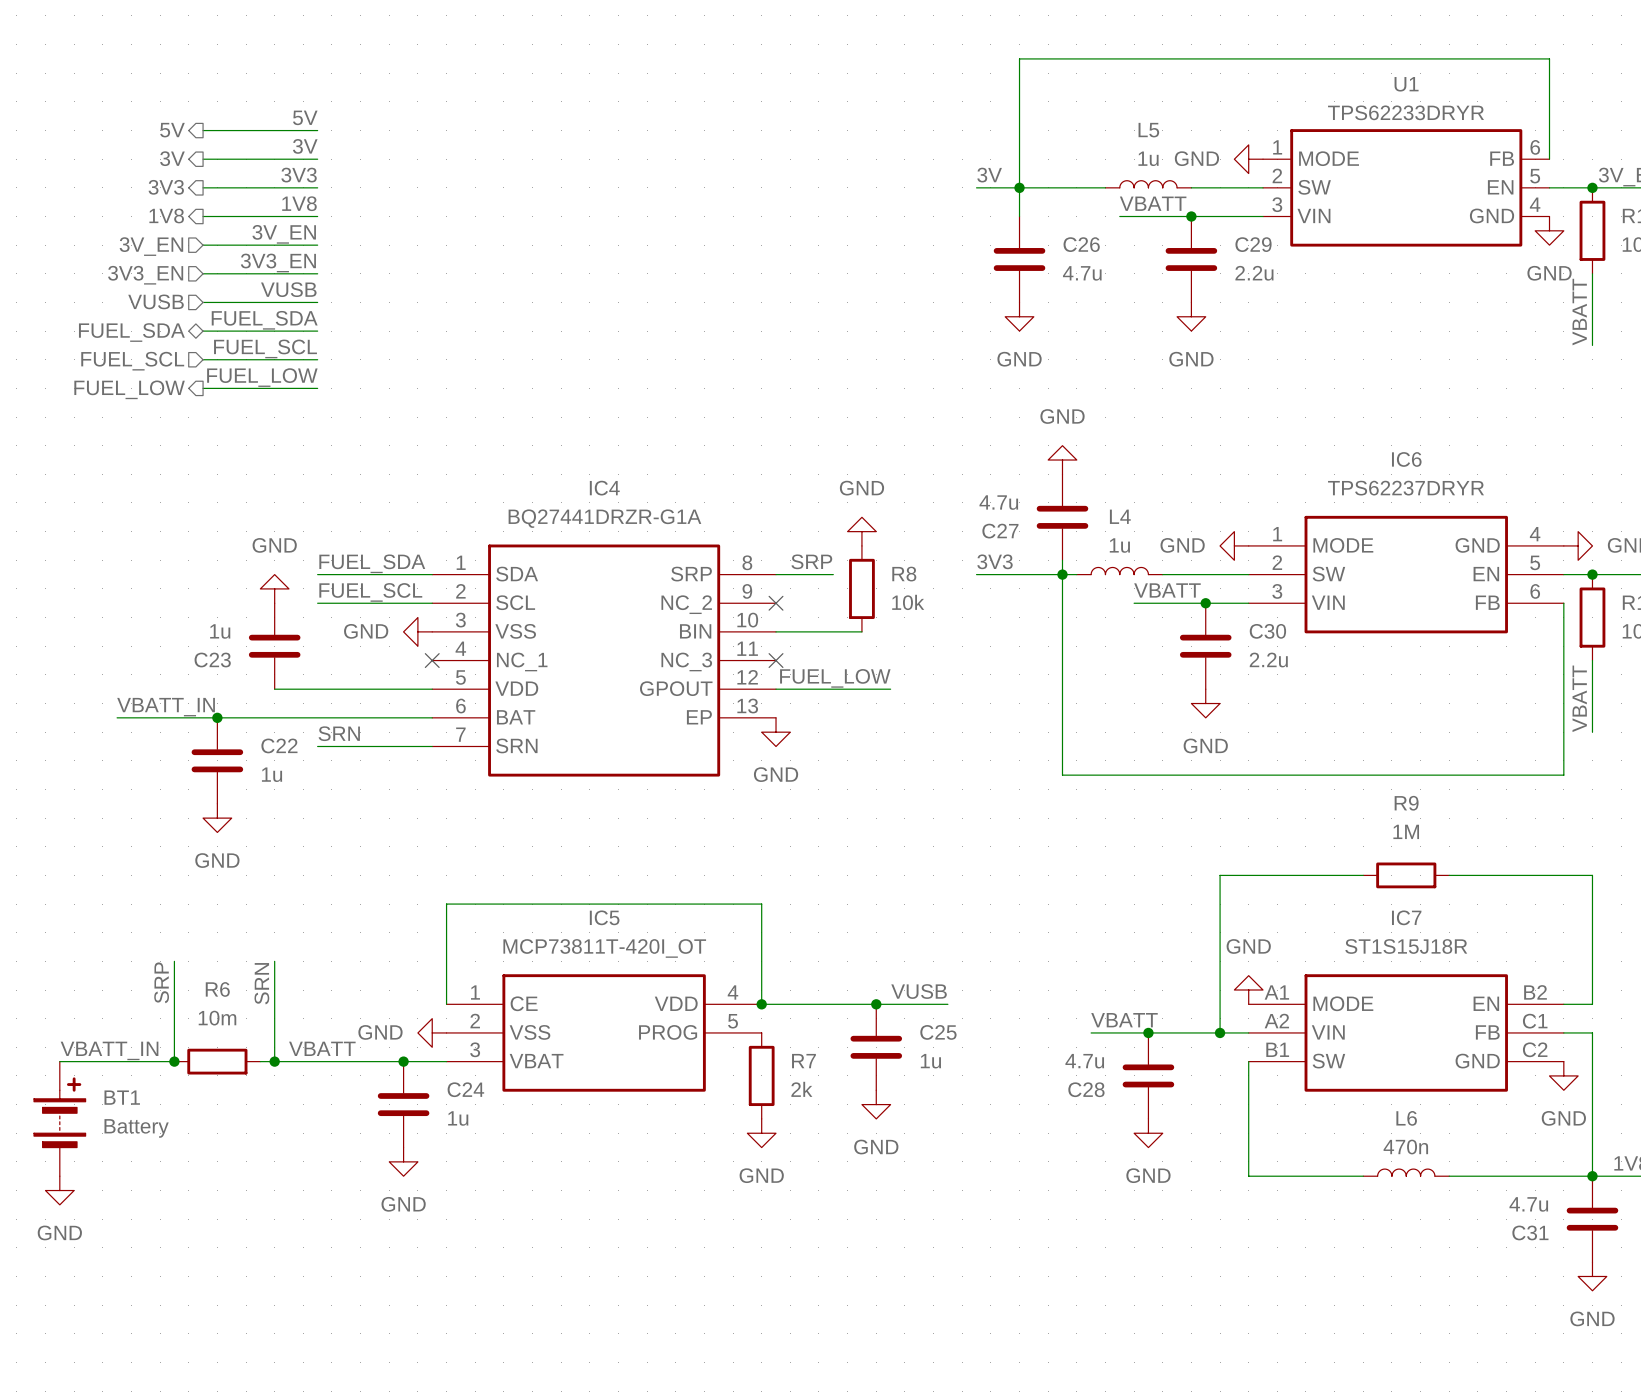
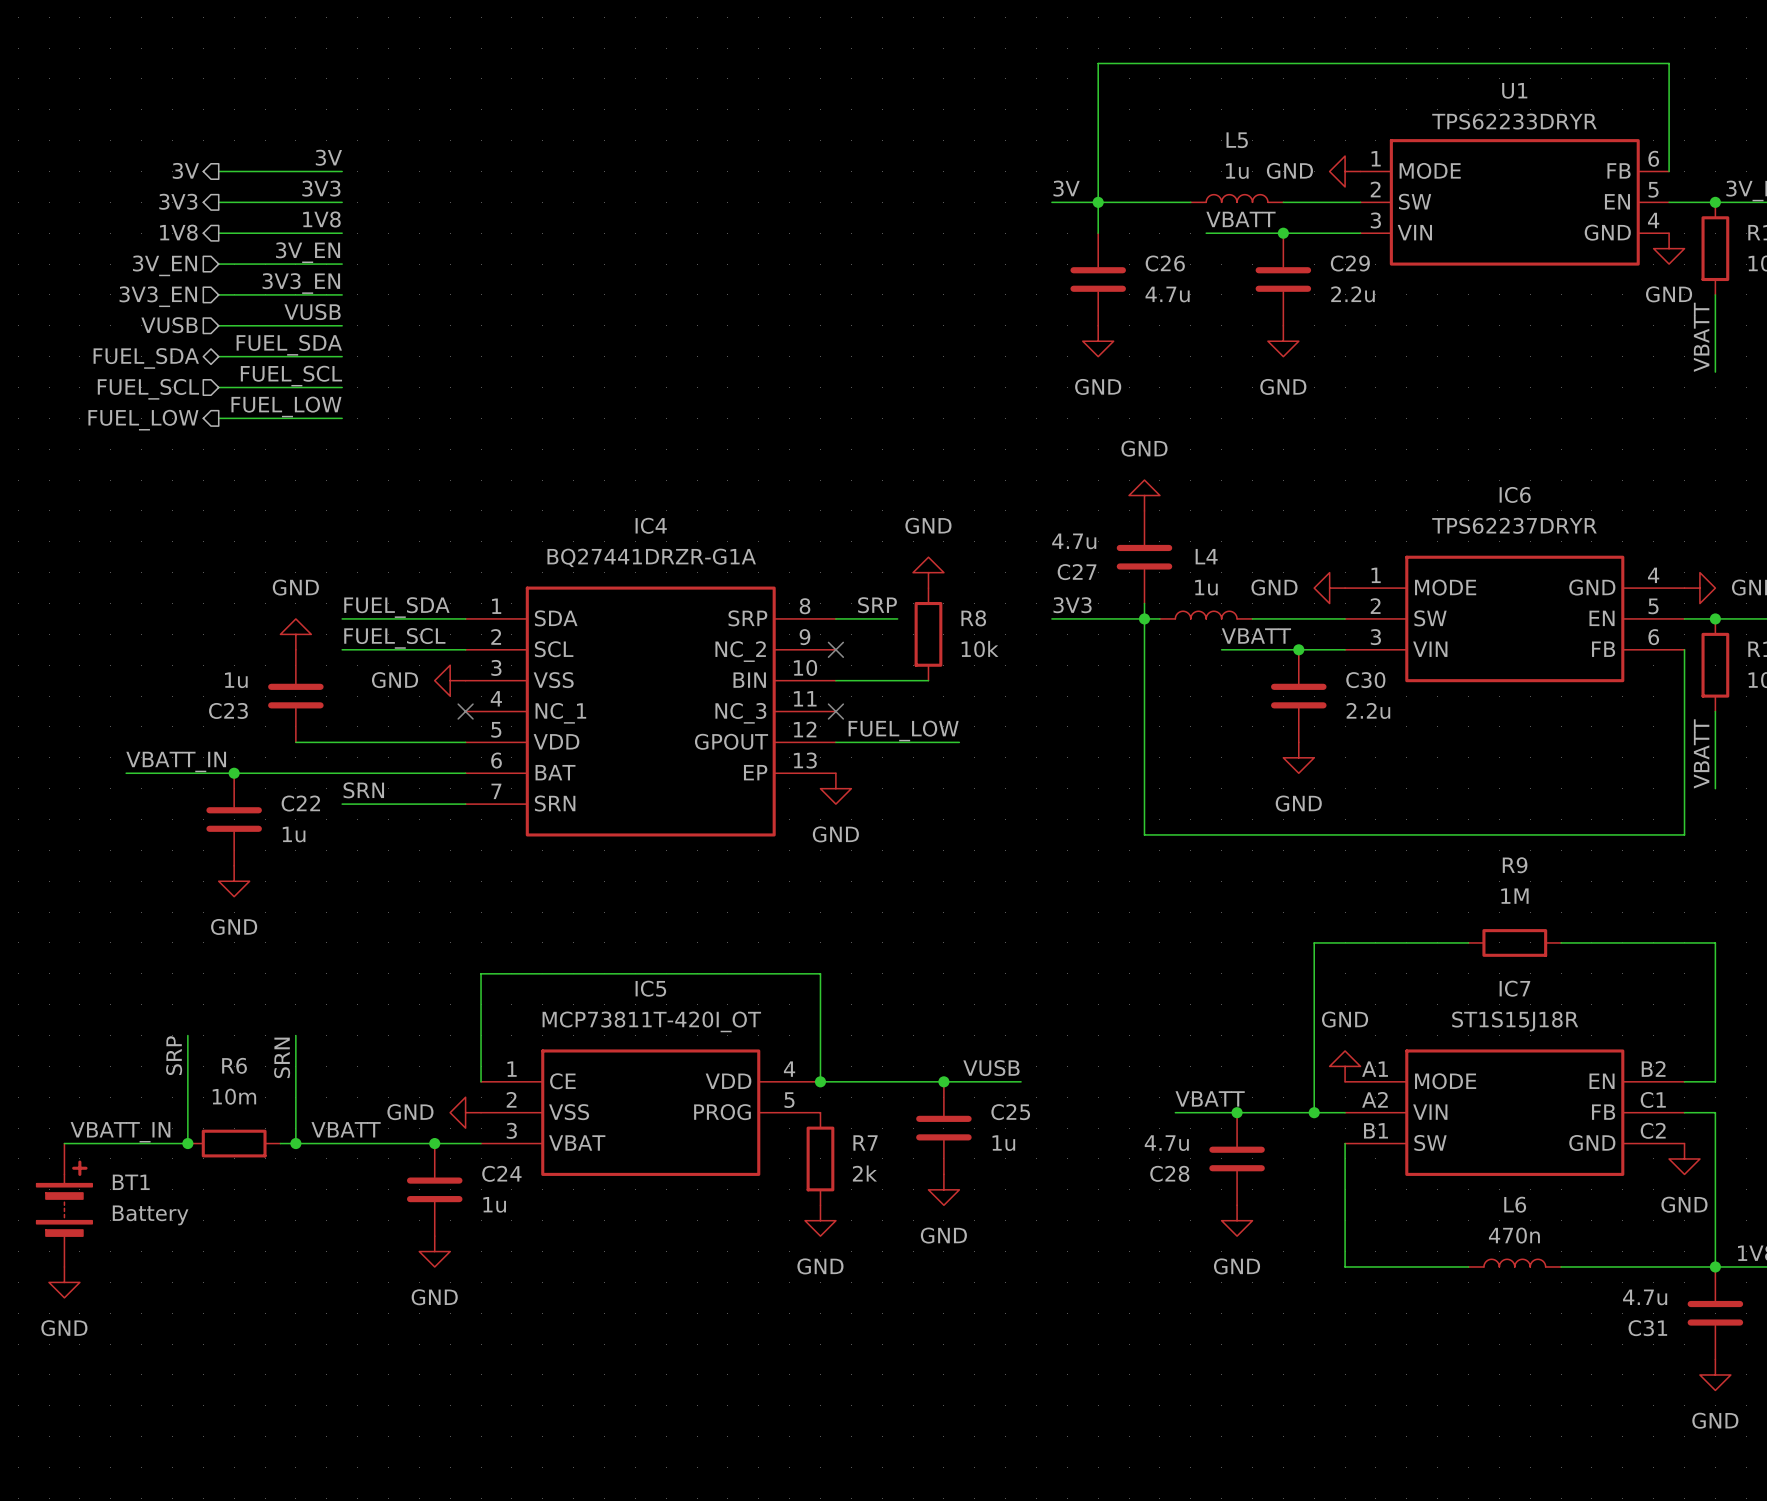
label: 5V (305, 117) -> none
hierarchical label: 5V (172, 130) -> none
wire: (203, 130) (317, 130) -> none

